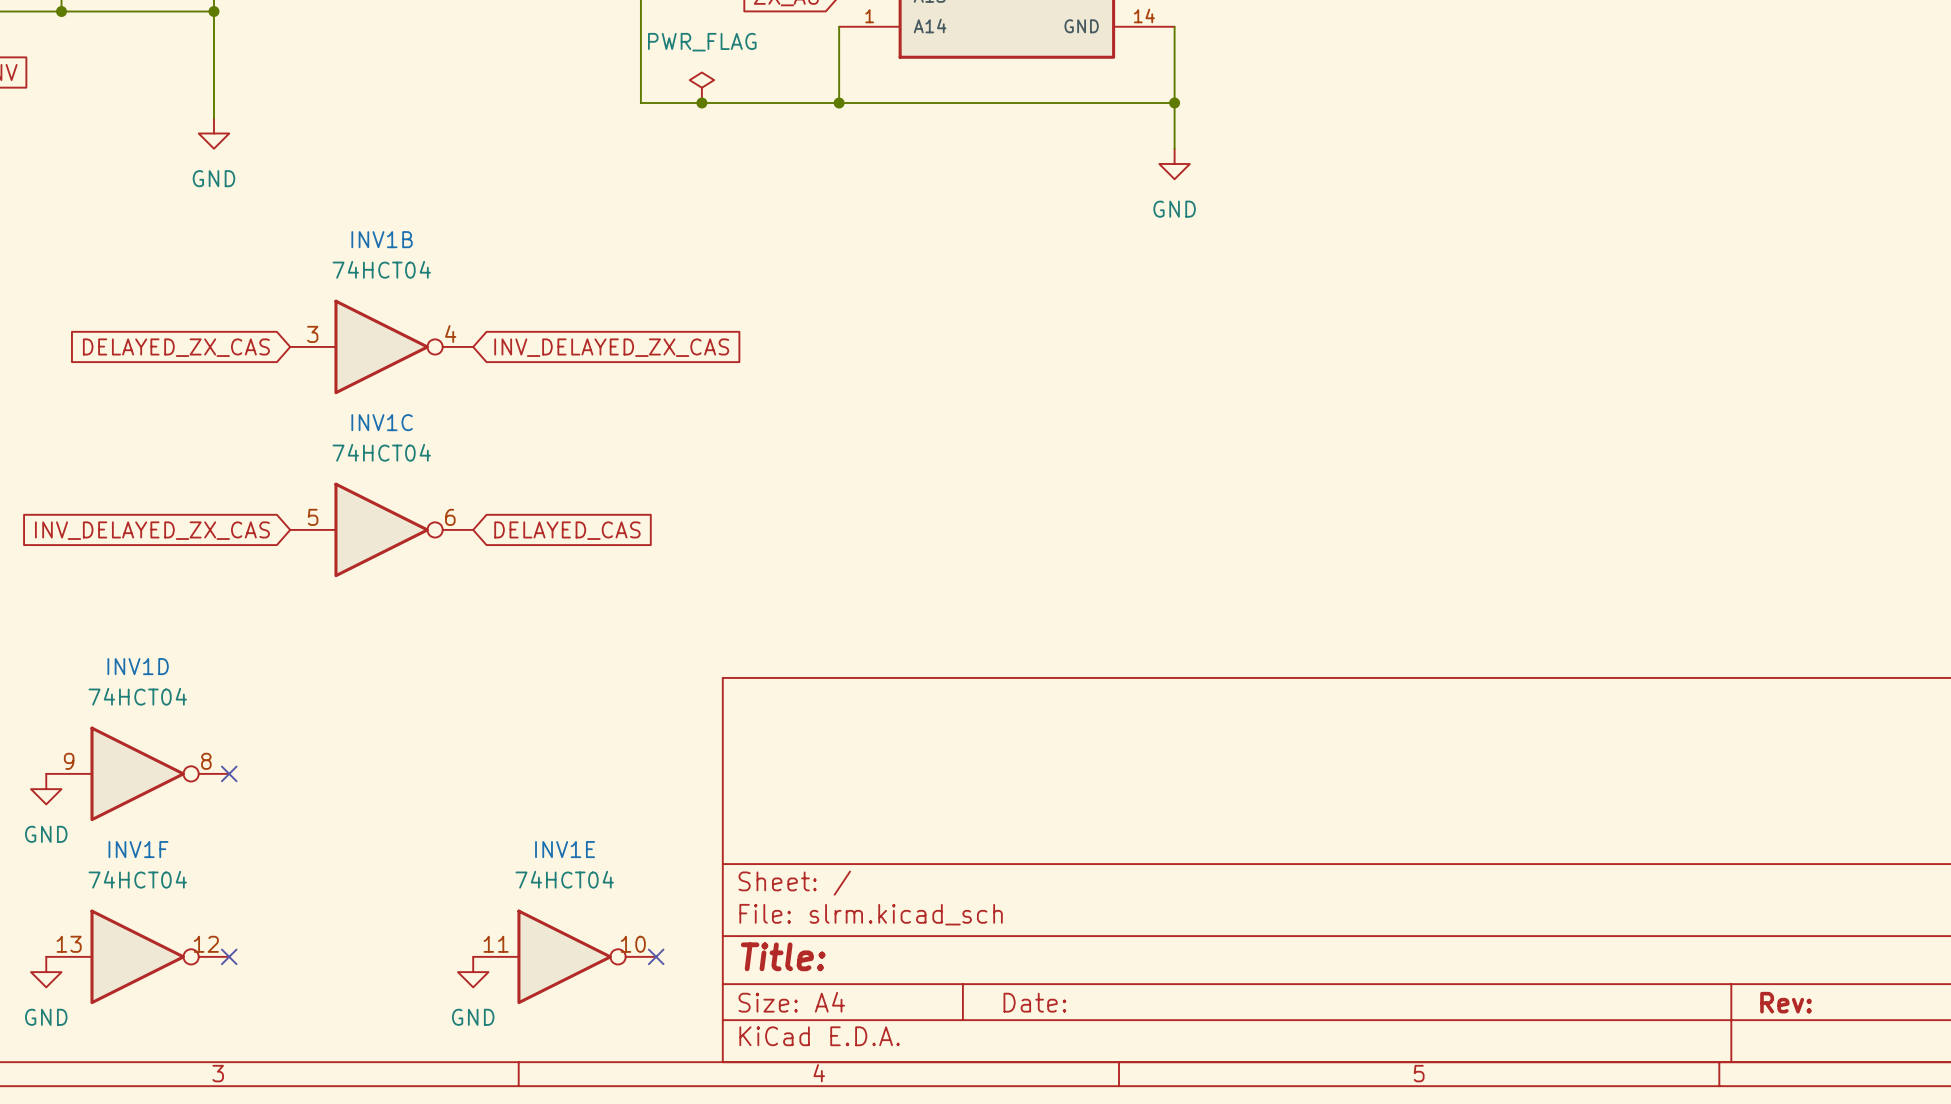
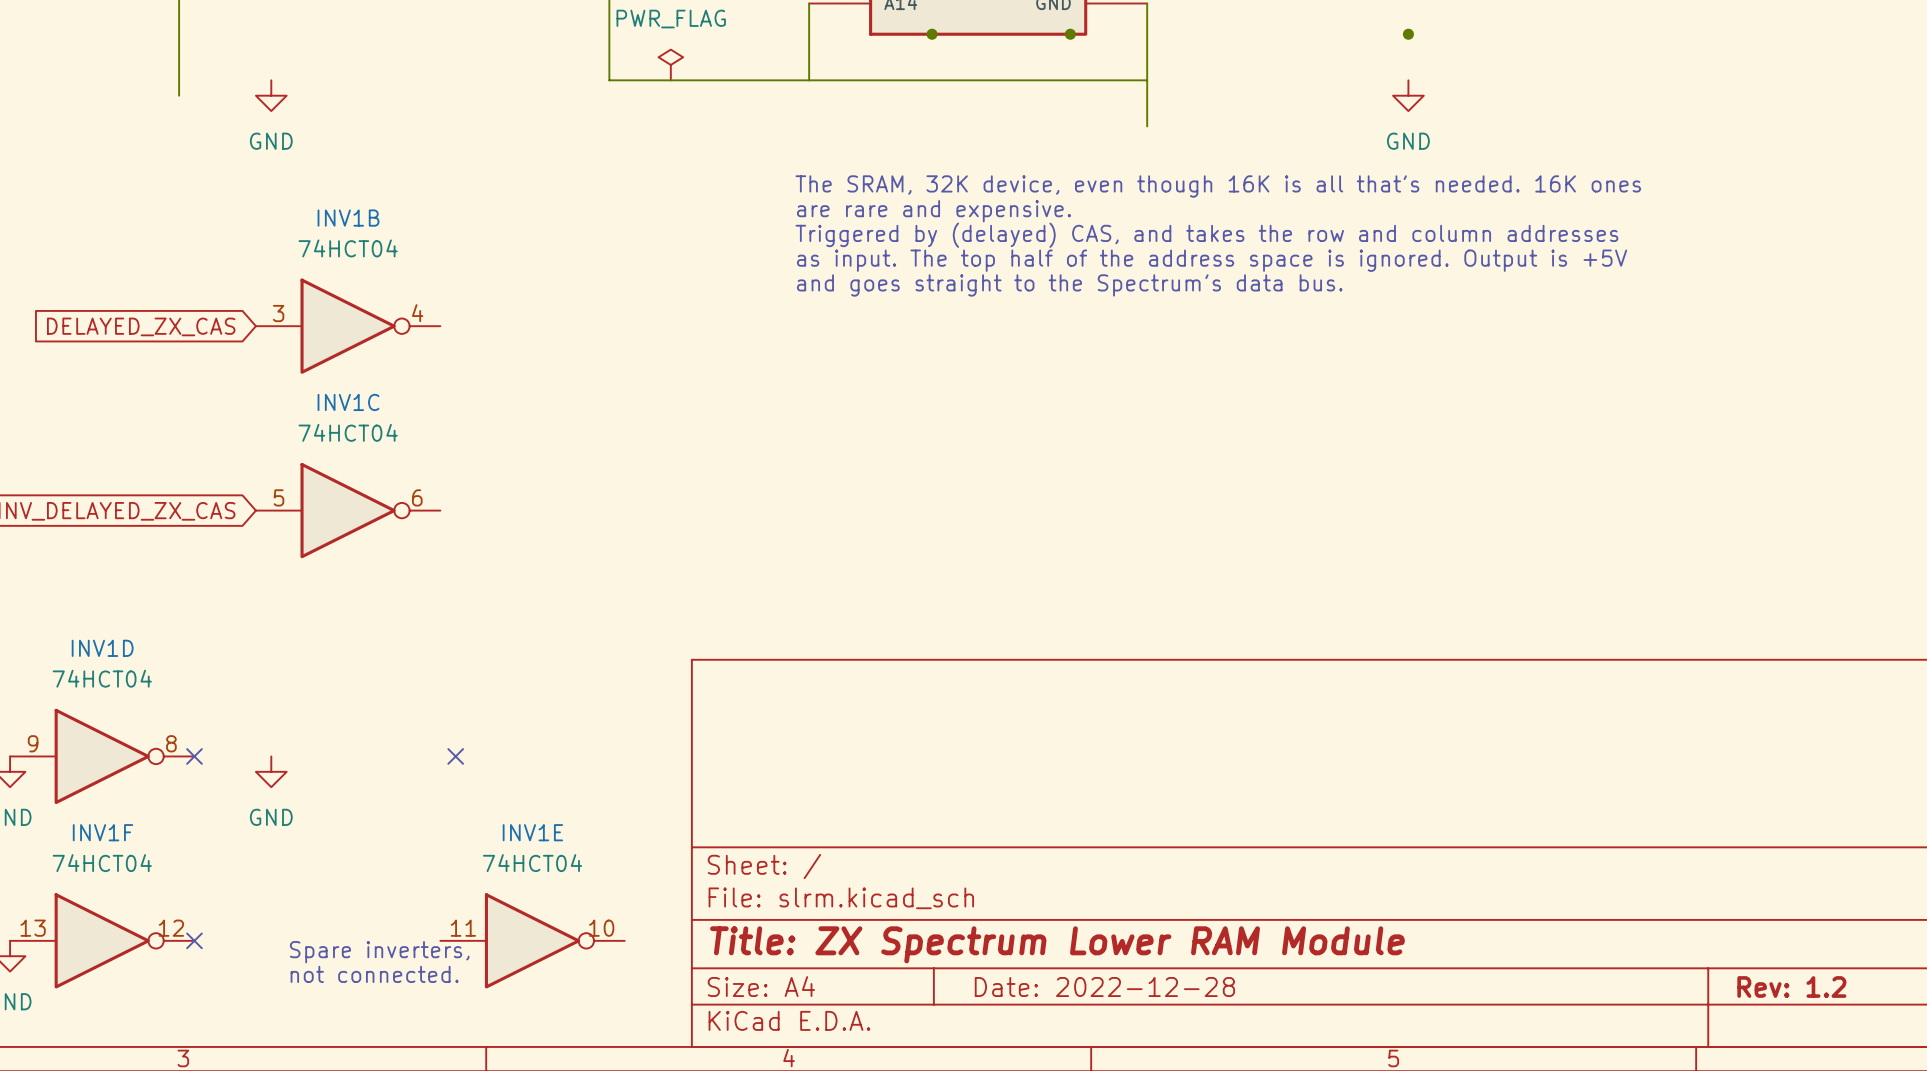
junction: none -> (932, 34)
junction: none -> (1070, 34)
junction: none -> (1408, 34)
junction: (701, 103) -> none
junction: (839, 103) -> none
junction: (1174, 103) -> none
power symbol position: GND (213, 133) -> GND (271, 95)
power symbol position: GND (1174, 163) -> GND (1408, 95)
text: none -> The SRAM, 32K device, even though 16K is all that's needed. 16K ones (1218, 186)
text: none -> are rare and expensive. (934, 211)
text: none -> Triggered by (delayed) CAS, and takes the row and column addresses (1206, 235)
text: none -> as input. The top half of the address space is ignored. Output is +5V (1212, 260)
text: none -> and goes straight to the Spectrum's data bus. (1069, 285)
global label: INV_DELAYED_ZX_CAS (611, 347) -> none
global label: DELAYED_CAS (567, 530) -> none
no-connect mark: none -> (455, 756)
no-connect mark: (656, 956) -> none
title block: Title: (783, 956) -> Title: ZX Spectrum Lower RAM Module (1057, 944)
text: none -> Spare inverters, (379, 952)
power symbol position: GND (473, 972) -> GND (271, 771)
text: none -> not connected. (374, 974)
title block: Date: (1034, 1002) -> Date: 2022-12-28 (1104, 987)
title block: Rev: (1786, 1002) -> Rev: 1.2 (1791, 987)

